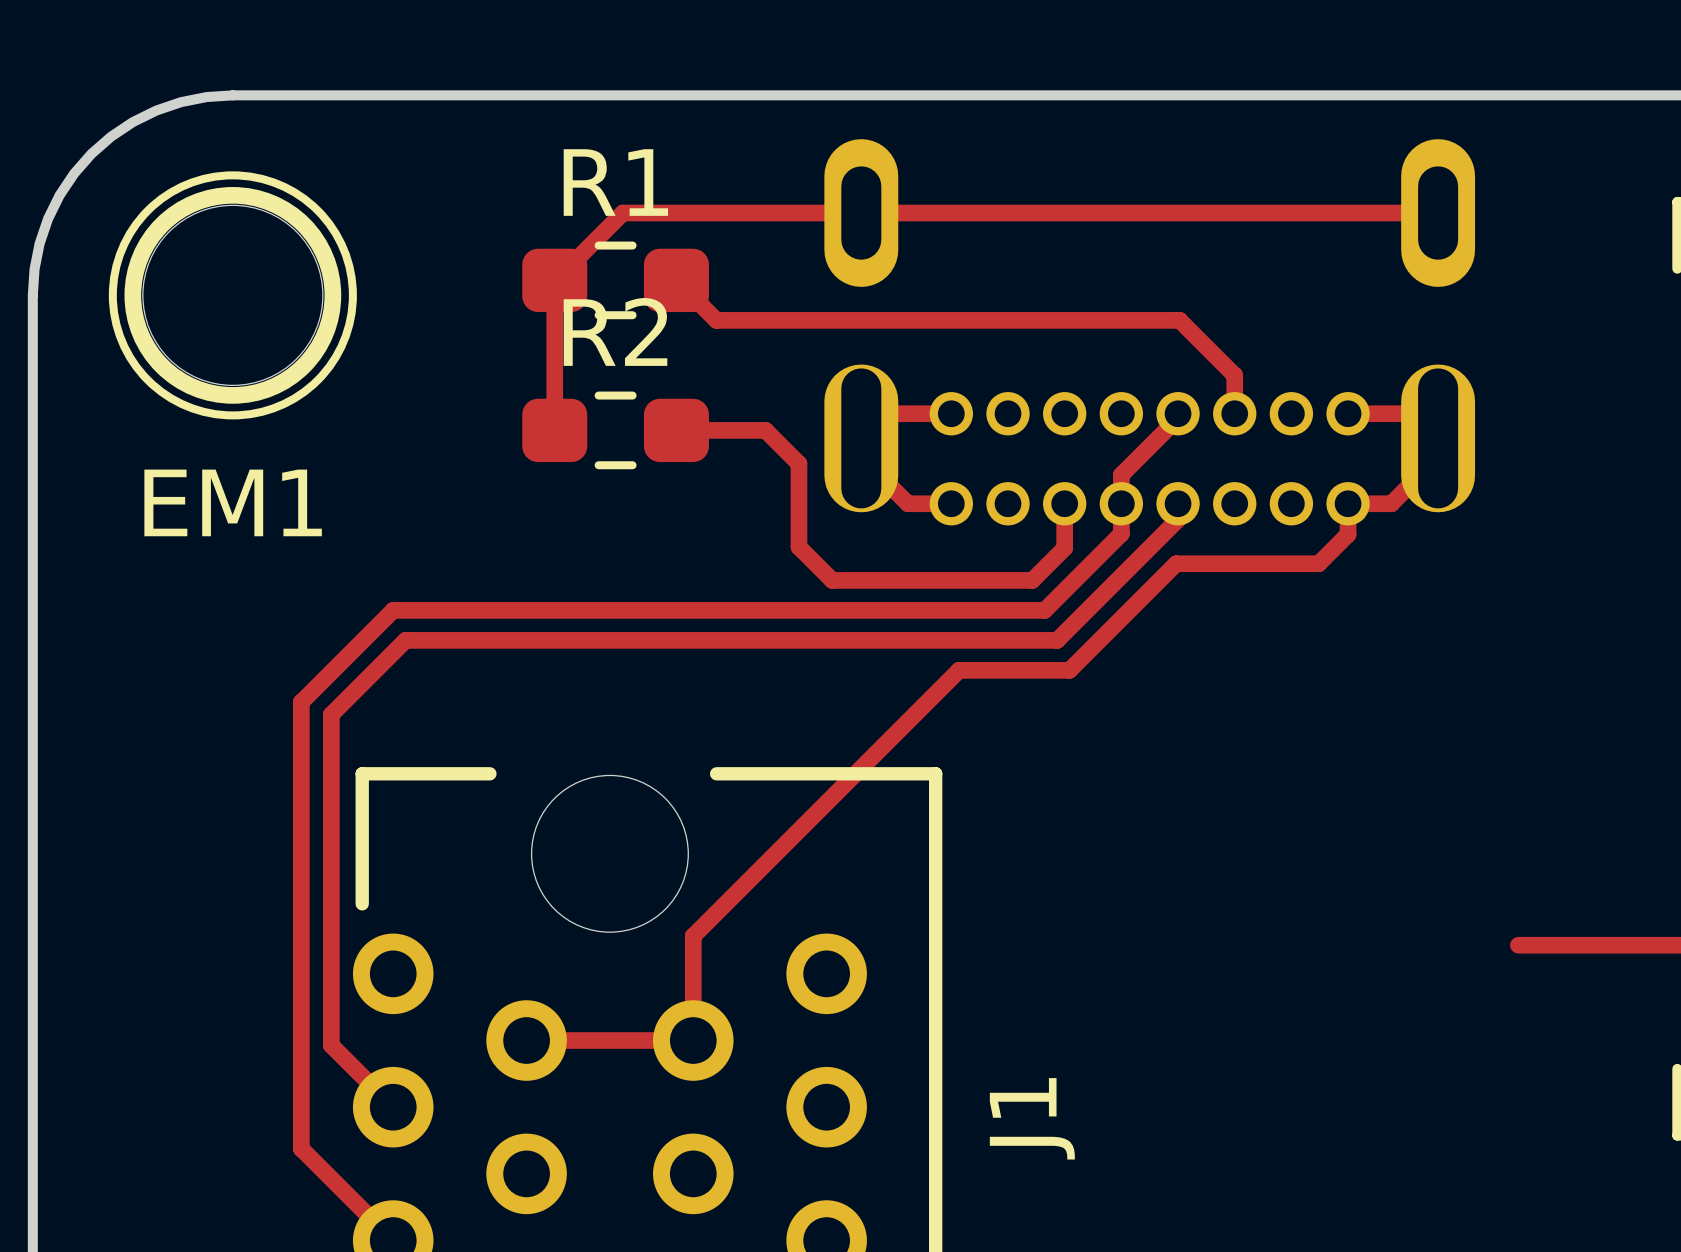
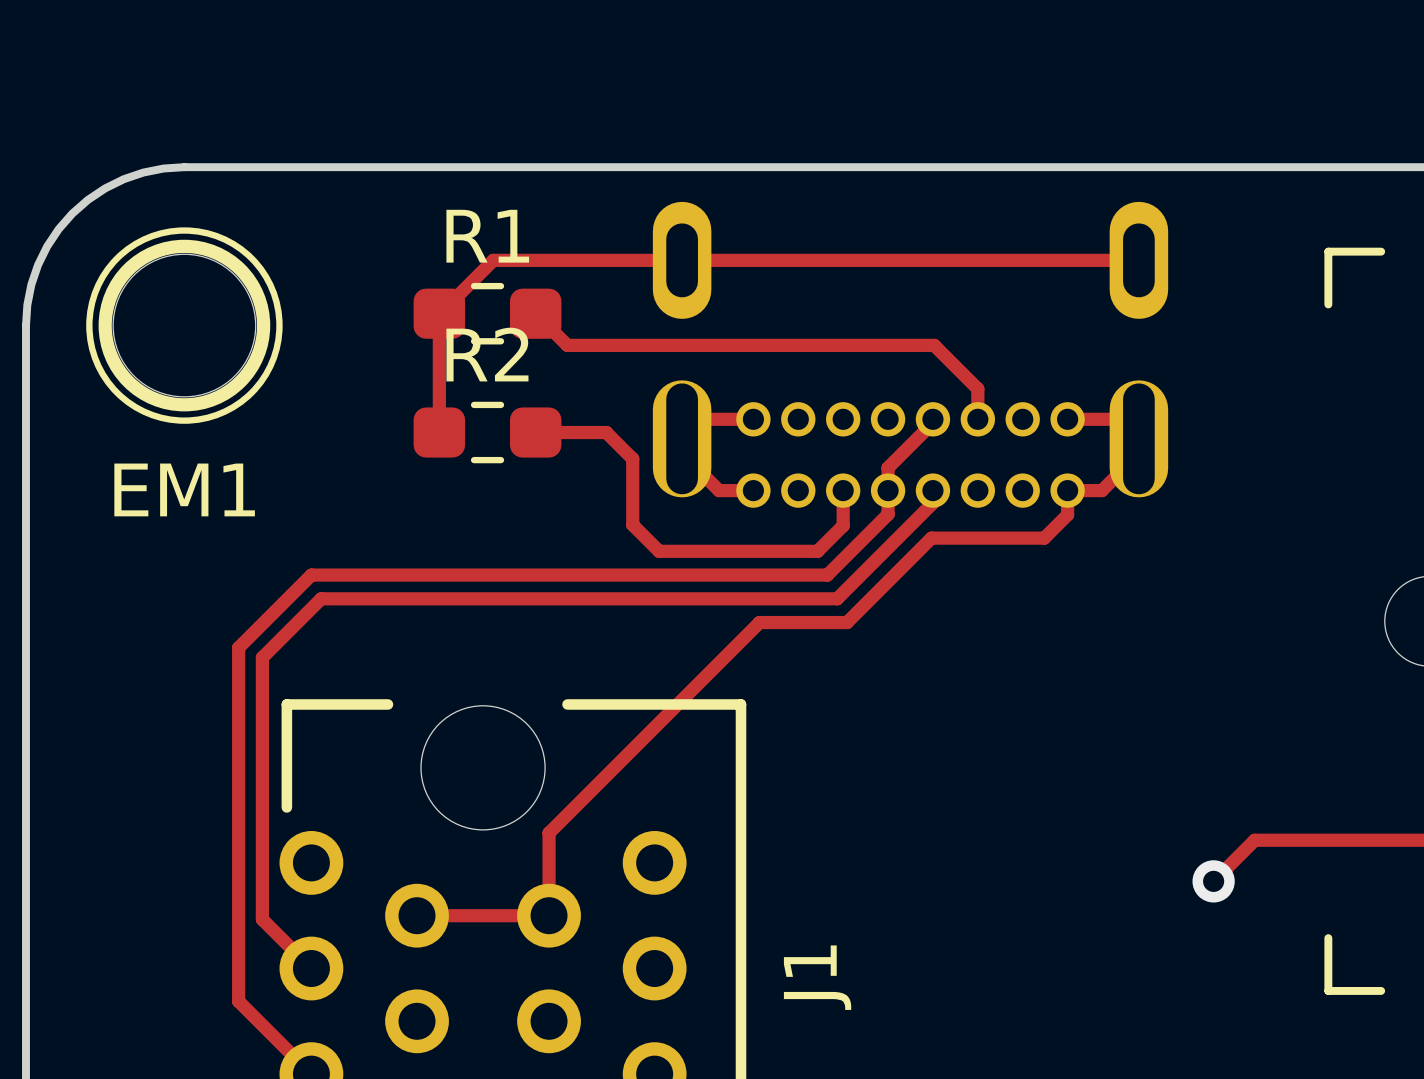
track: (1518, 945) (1584, 945) -> (1213, 881) (1254, 840)
via: none -> (1213, 881)

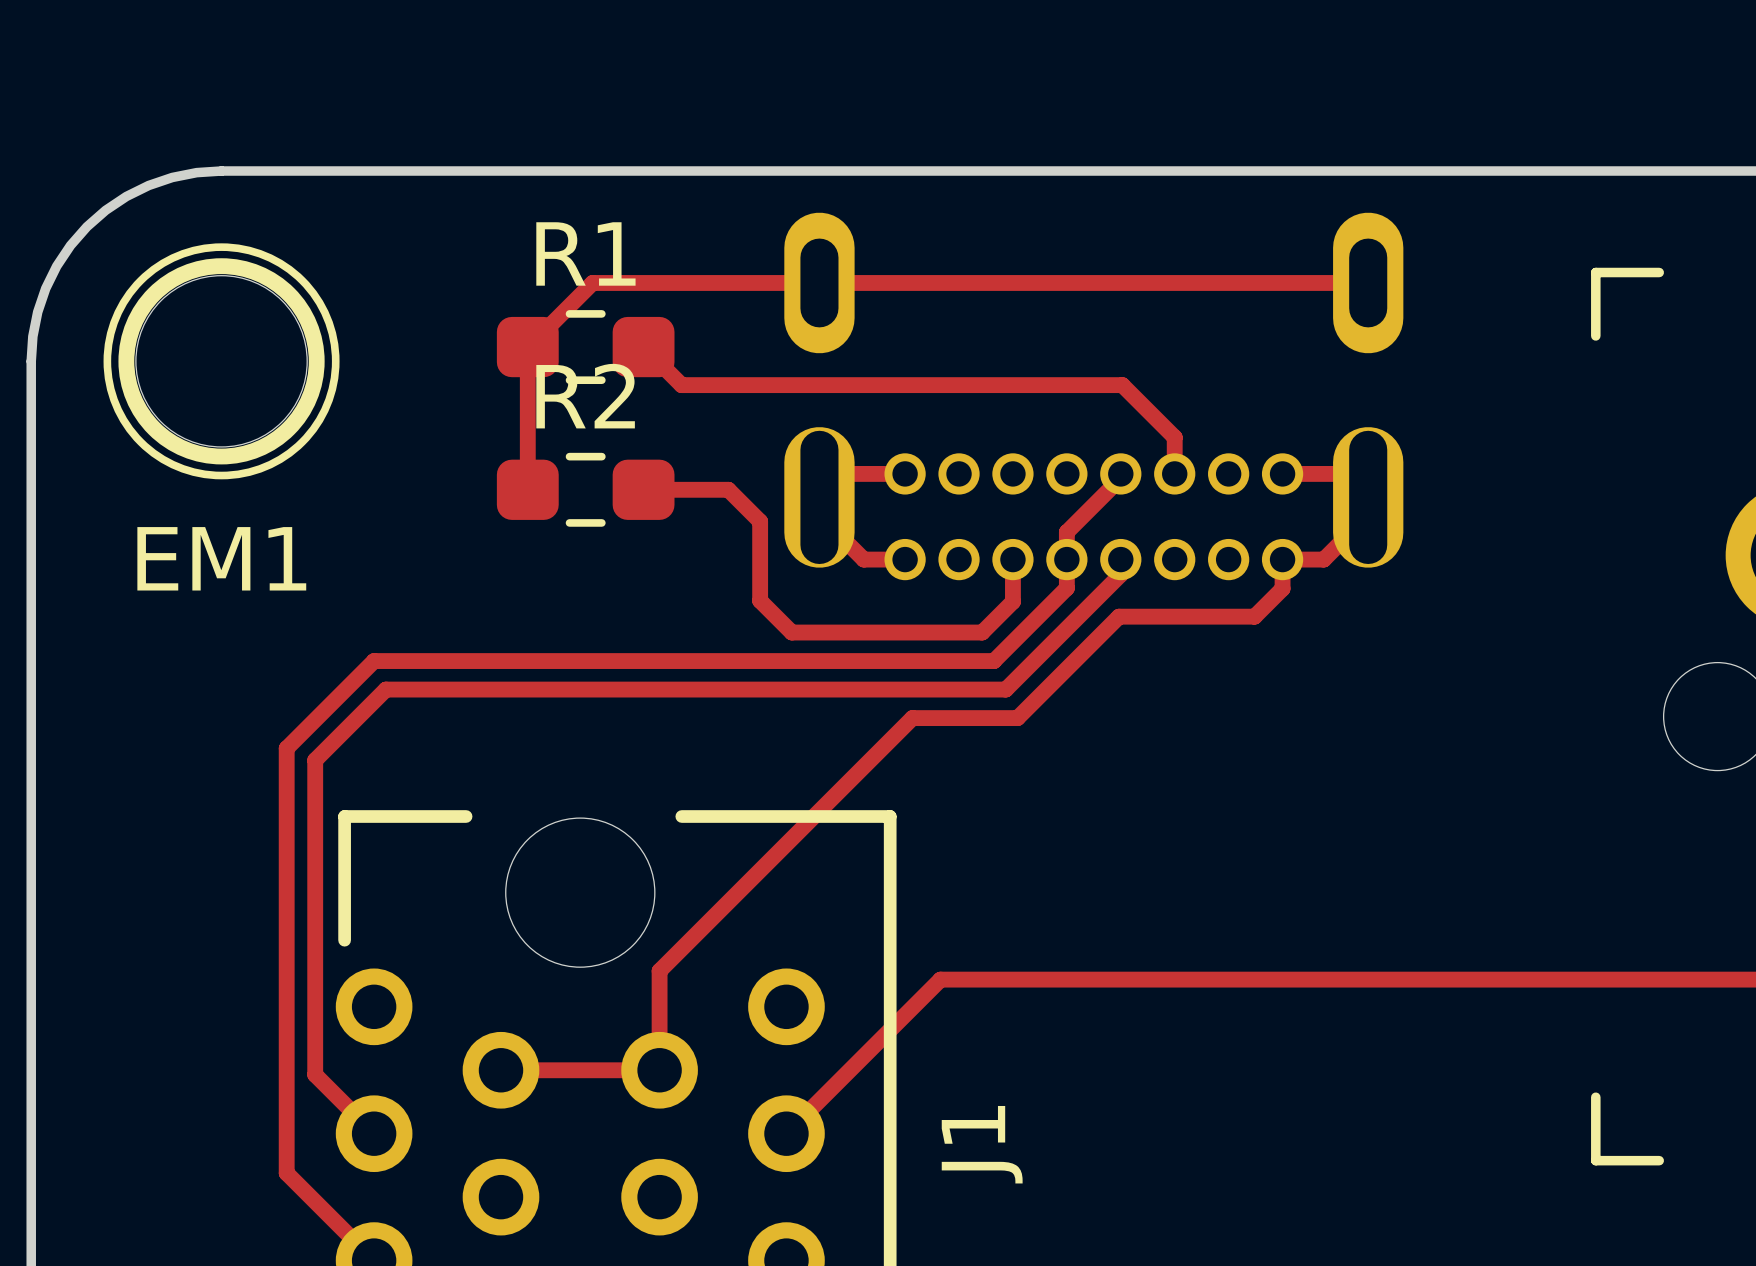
track: (1254, 840) (1213, 881) -> (1507, 979) (940, 979) (786, 1133)
via: (1213, 881) -> none

